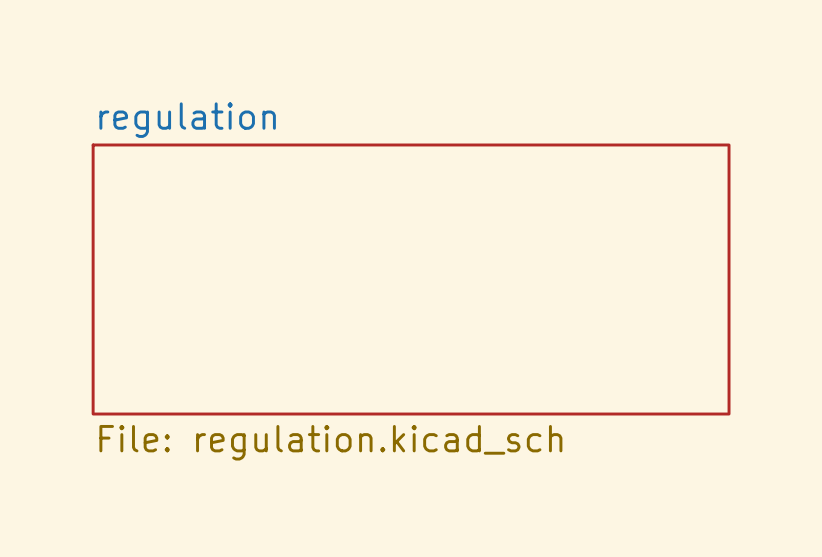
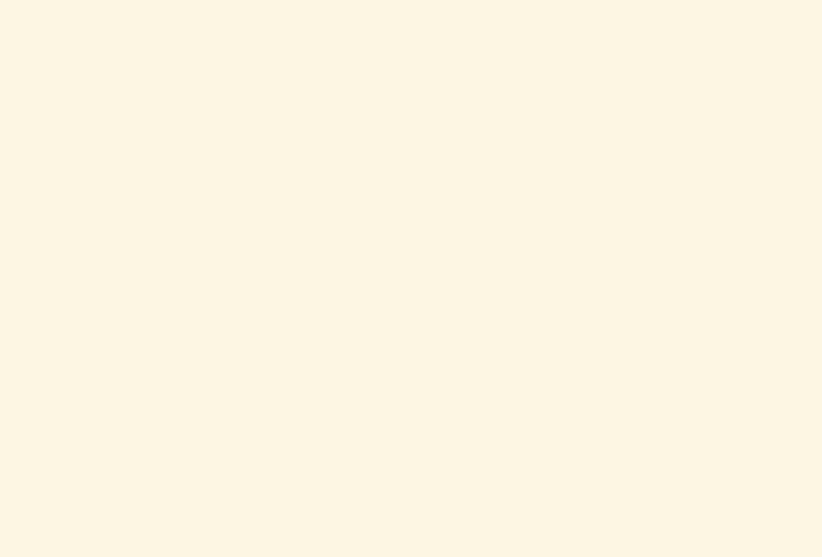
sheet regulation: File: regulation.kicad_sch (411, 279) -> none

